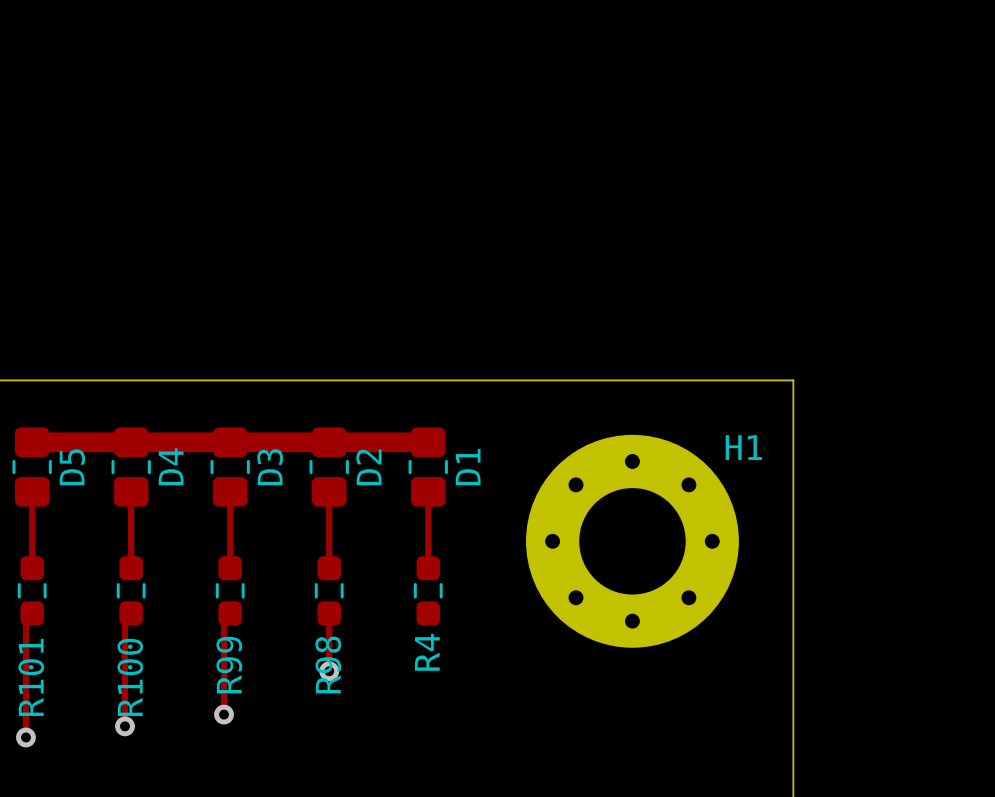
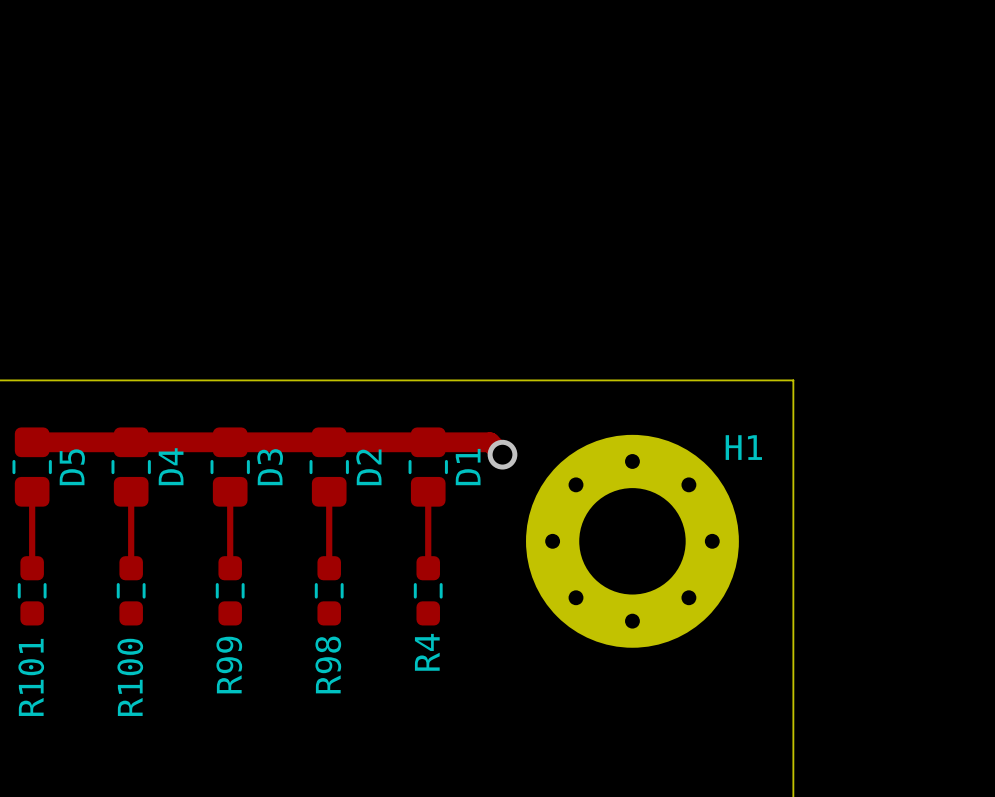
track: none -> (428, 442) (490, 442) (502, 454)
via: none -> (502, 454)
track: (32, 613) (25, 619) (25, 737) -> none
track: (131, 613) (124, 619) (124, 726) -> none
track: (230, 613) (224, 619) (224, 714) -> none
track: (329, 613) (329, 671) -> none
via: (329, 671) -> none
via: (224, 714) -> none
via: (124, 726) -> none
via: (25, 737) -> none

